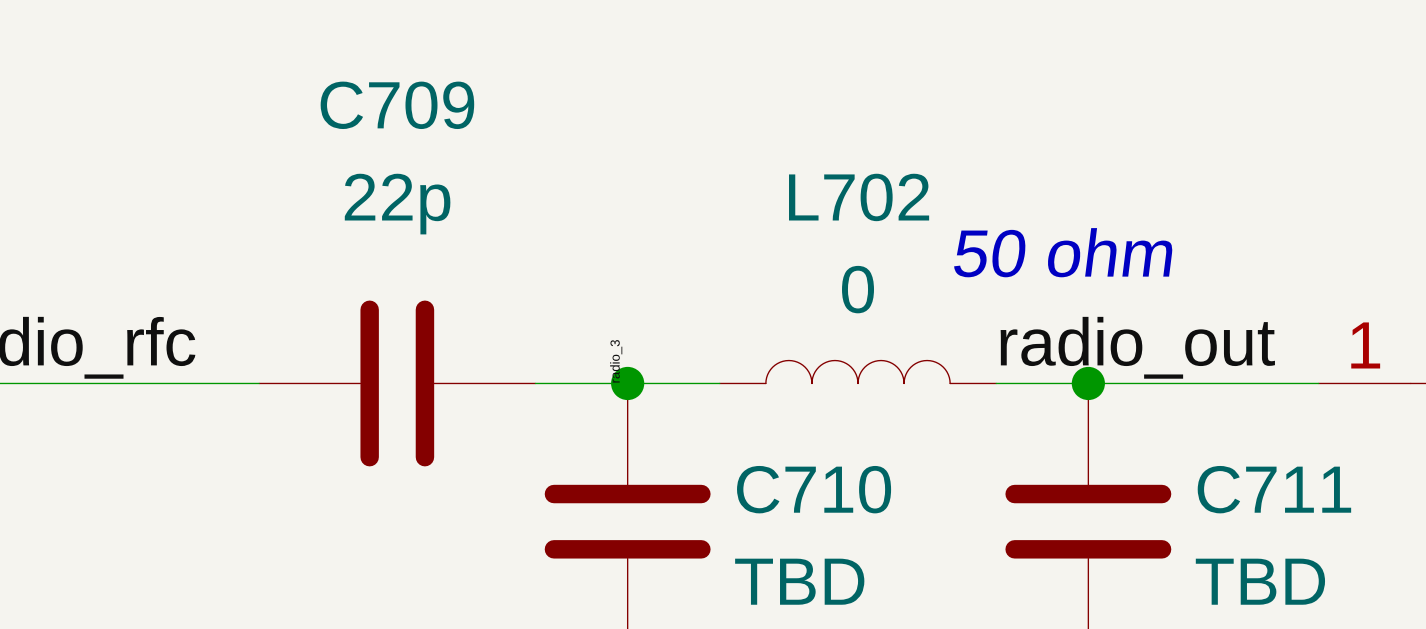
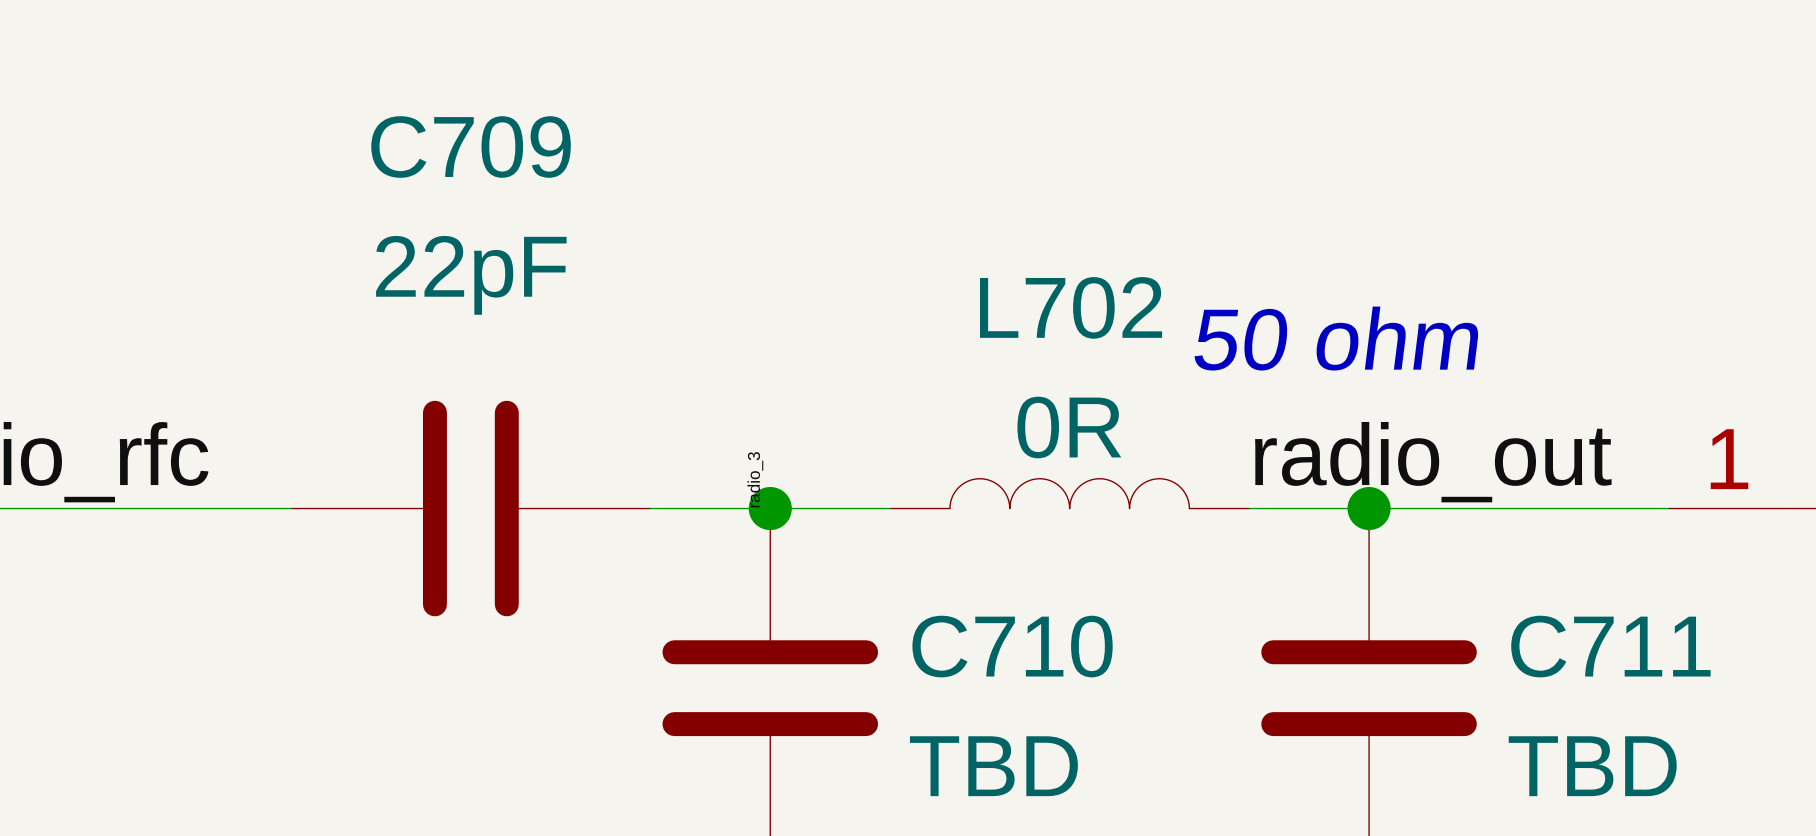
L702 name position: L702 (859, 197) -> L702 (1071, 307)
C709 value: 22p (397, 204) -> 22pF (471, 275)
L702 value: 0 (858, 289) -> 0R (1069, 427)

